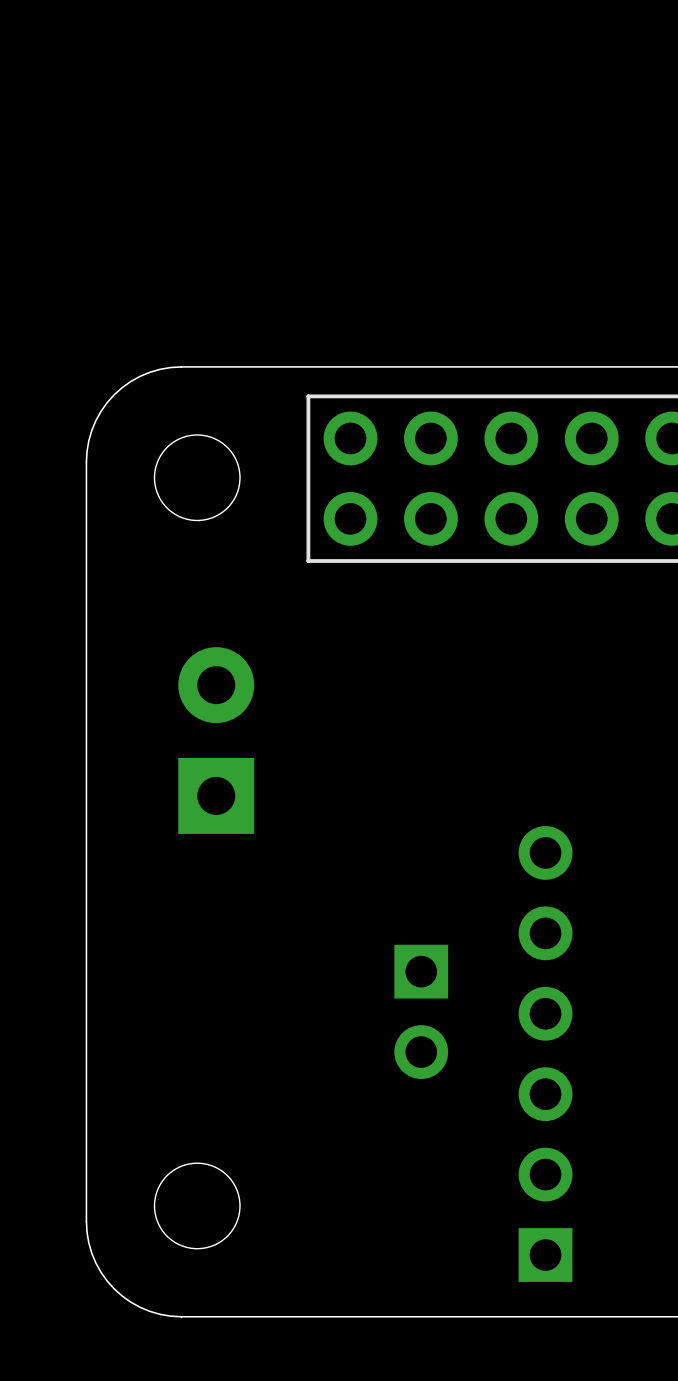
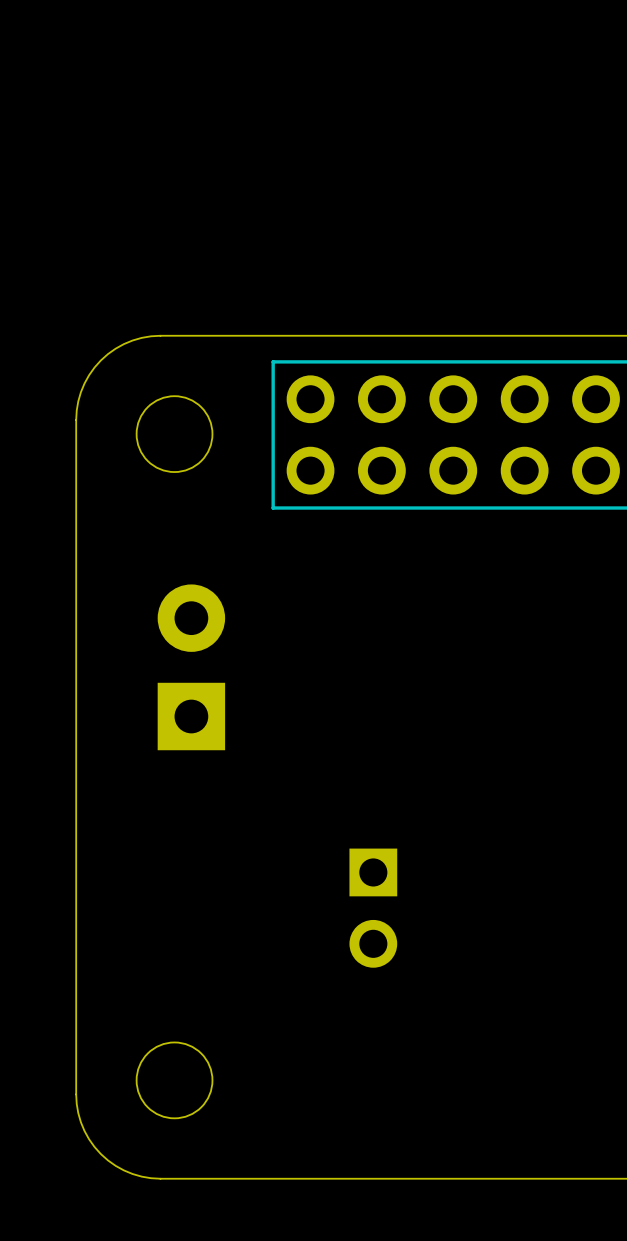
part: (545, 1053) -> none

